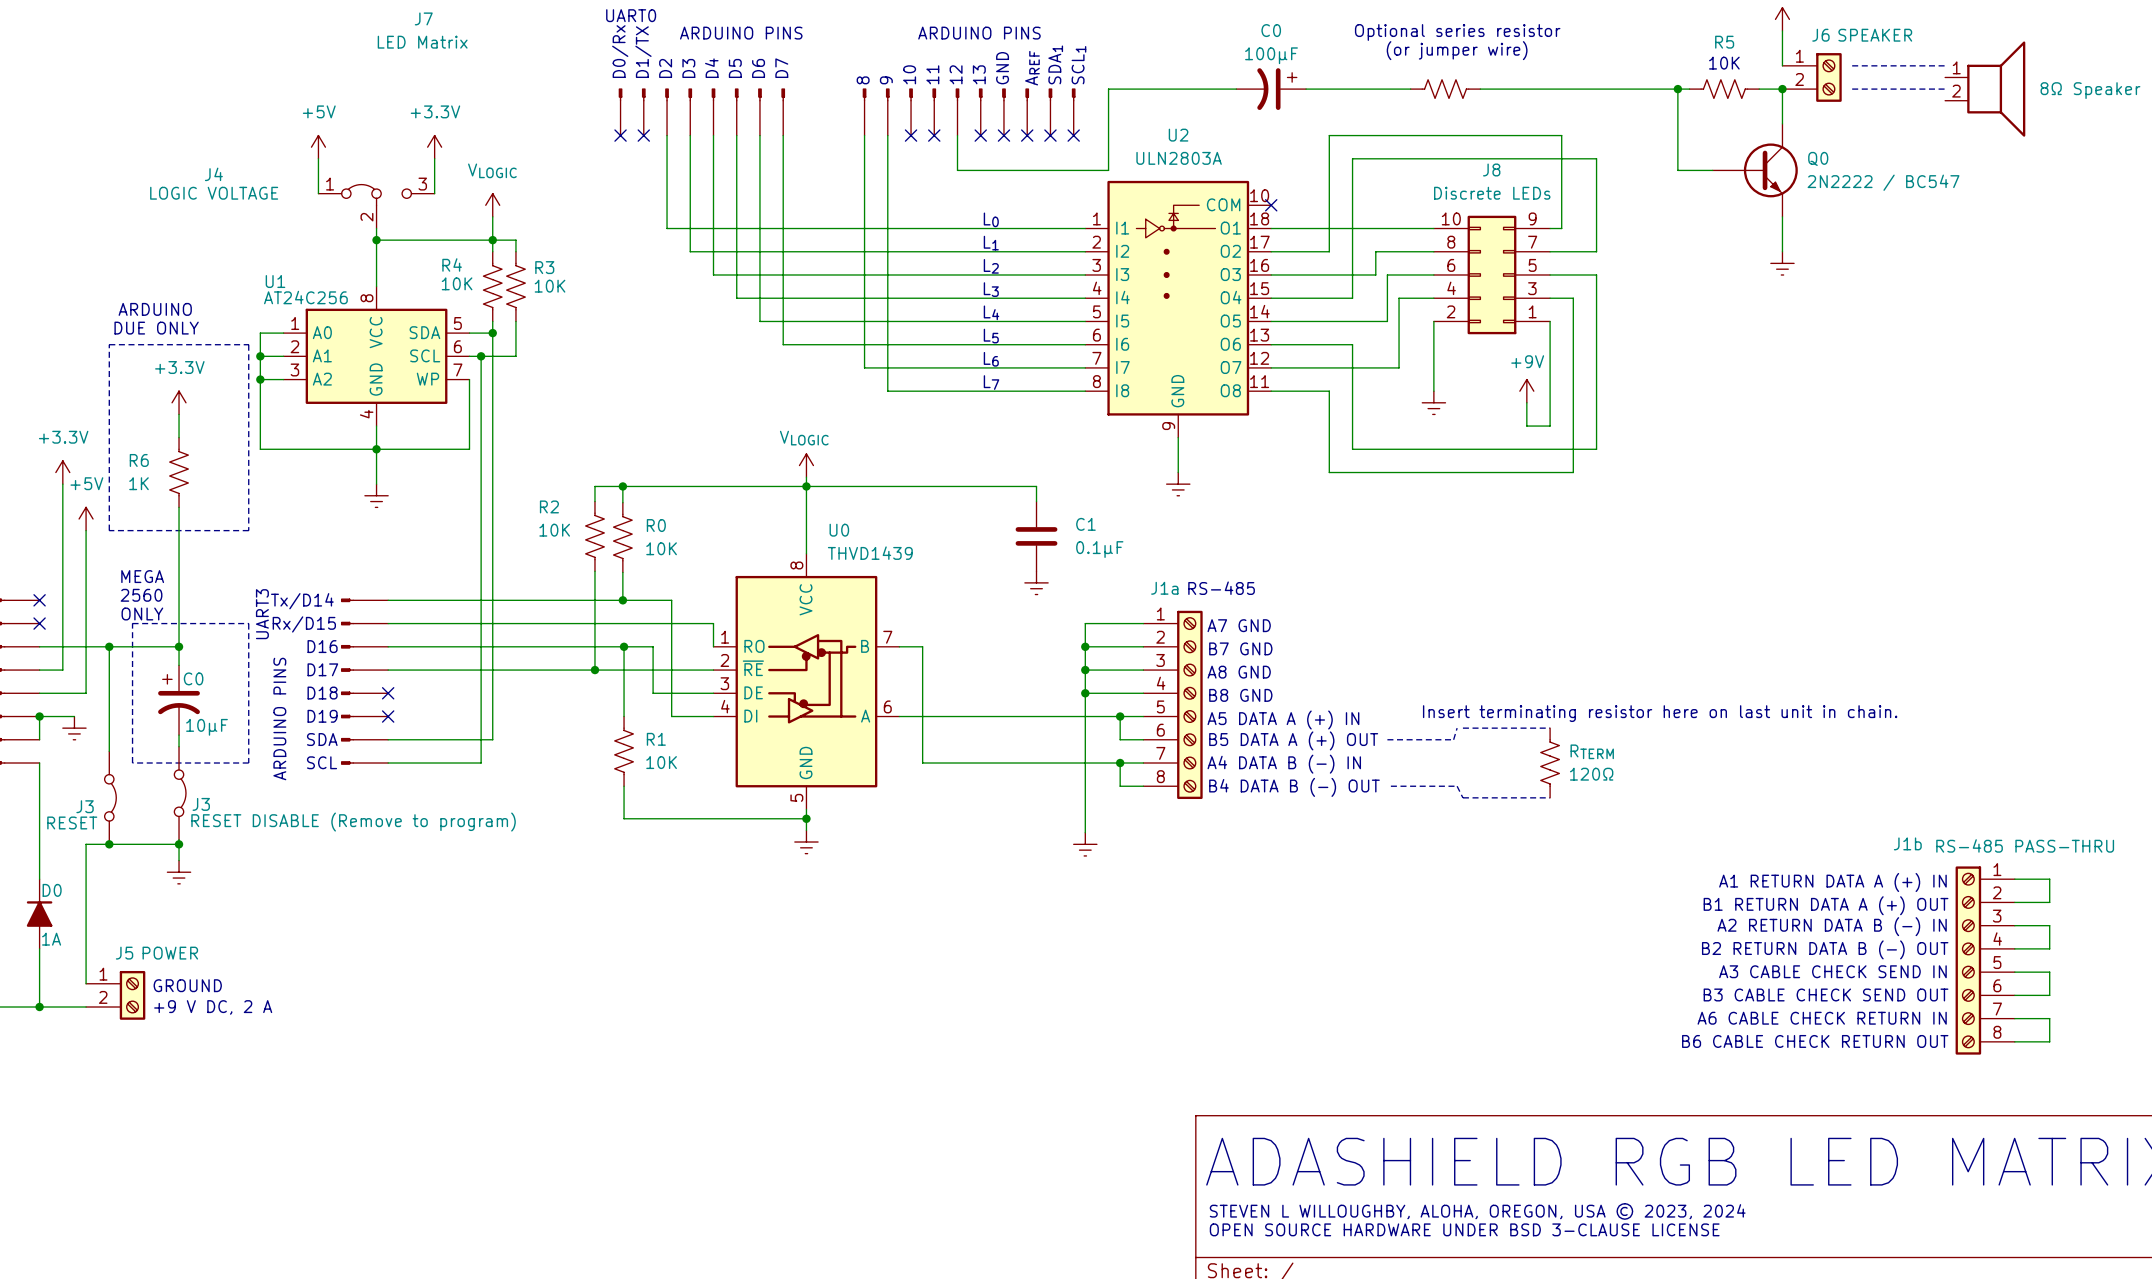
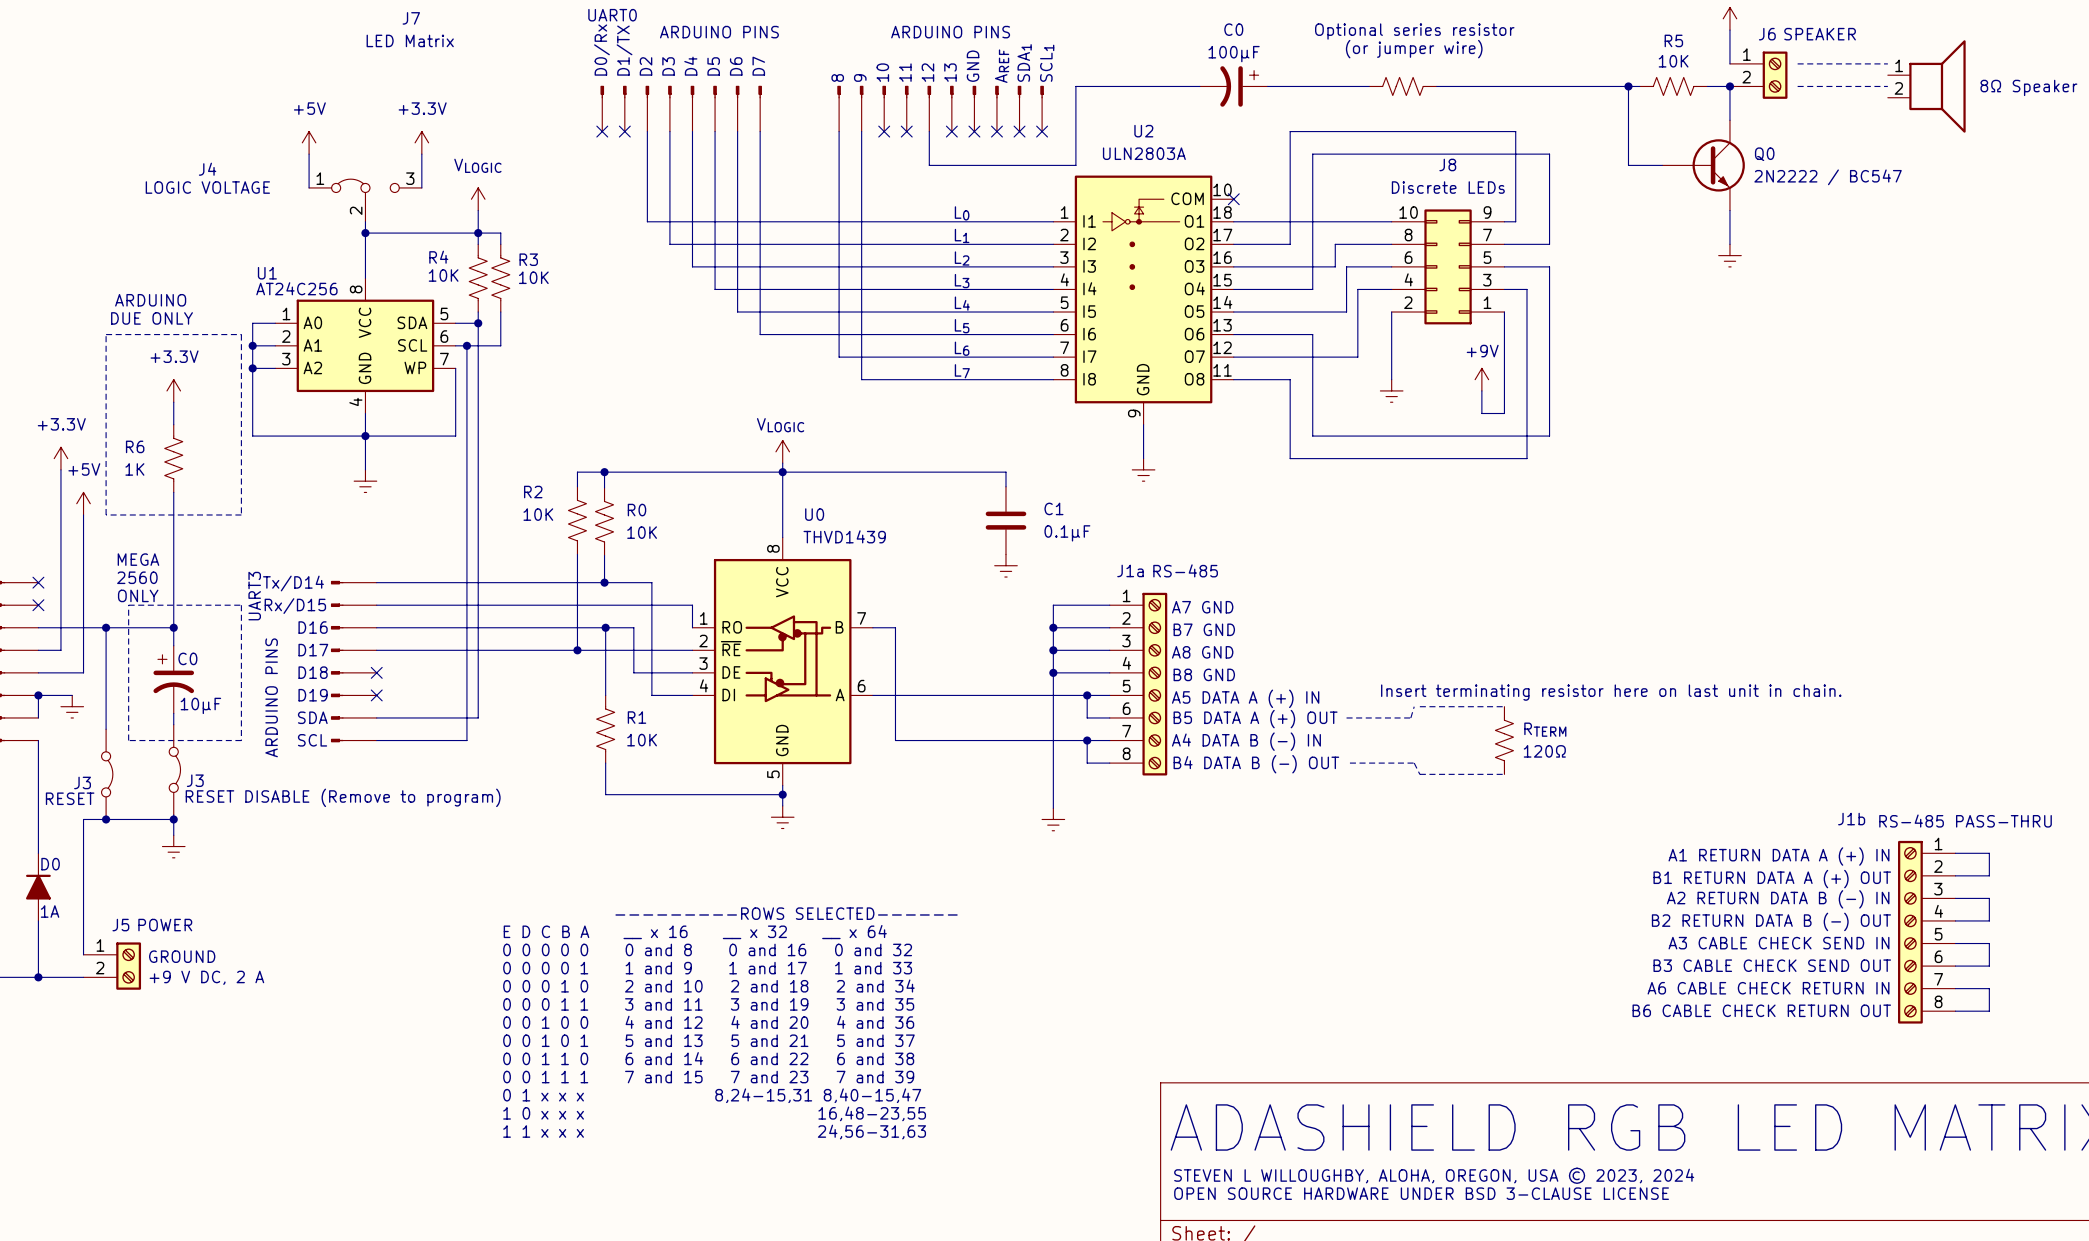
text: none -> ---------ROWS SELECTED------ (786, 913)
text: none -> E D C B A __ x 16 __ x 32 __ x 64 (695, 932)
text: none -> 0 0 0 0 0 0 and 8 0 and 16 0 and 32 (707, 949)
text: none -> 0 0 0 0 1 1 and 9 1 and 17 1 and 33 (707, 968)
text: none -> 0 0 0 1 0 2 and 10 2 and 18 2 and 34 (708, 986)
text: none -> 0 0 0 1 1 3 and 11 3 and 19 3 and 35 (708, 1004)
text: none -> 0 0 1 0 0 4 and 12 4 and 20 4 and 36 (708, 1022)
text: none -> 0 0 1 0 1 5 and 13 5 and 21 5 and 37 (708, 1040)
text: none -> 0 0 1 1 0 6 and 14 6 and 22 6 and 38 (708, 1058)
text: none -> 0 0 1 1 1 7 and 15 7 and 23 7 and 39 (708, 1077)
text: none -> 0 1 x x x 8,24-15,31 8,40-15,47 (712, 1095)
text: none -> 1 0 x x x 16,48-23,55 (714, 1113)
text: none -> 1 1 x x x 24,56-31,63 (714, 1132)

